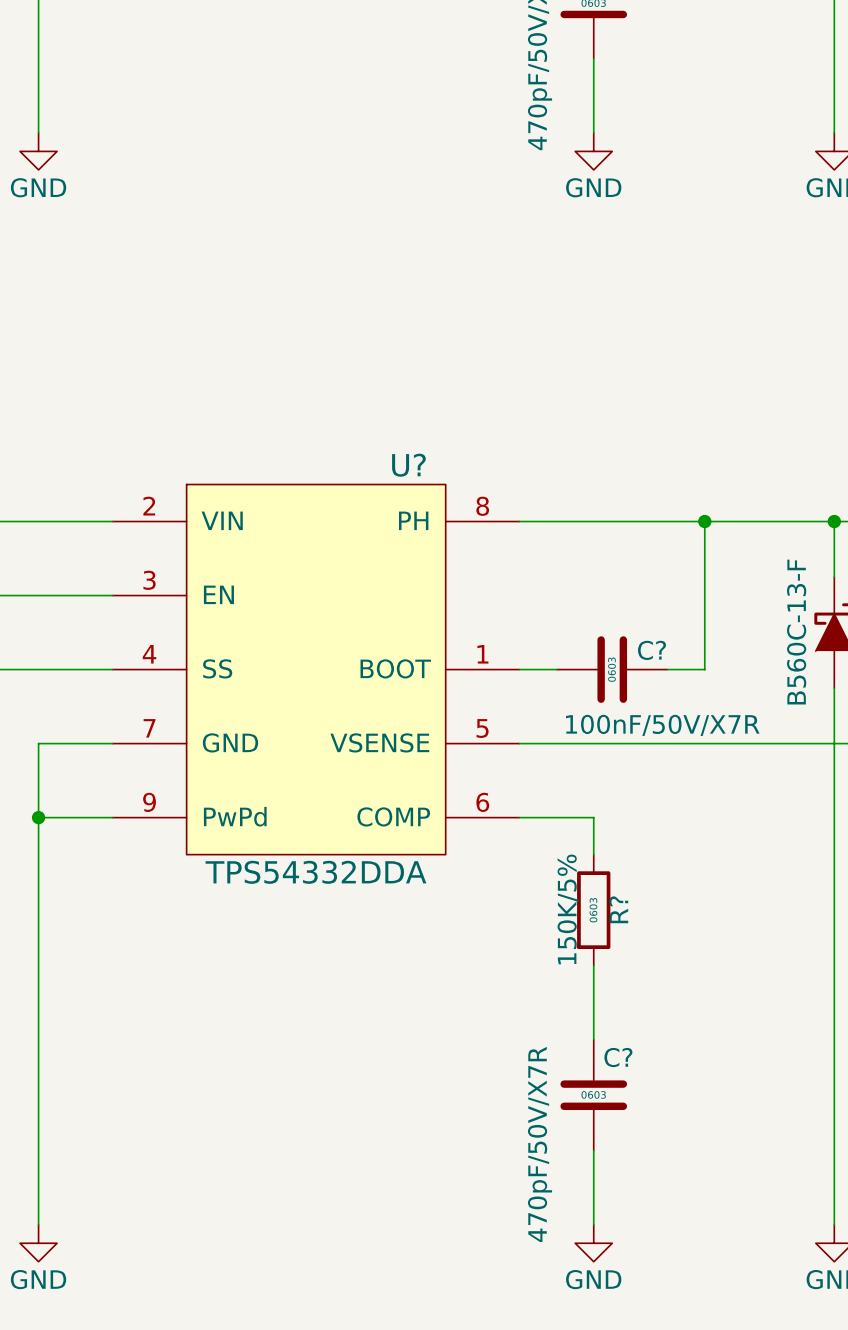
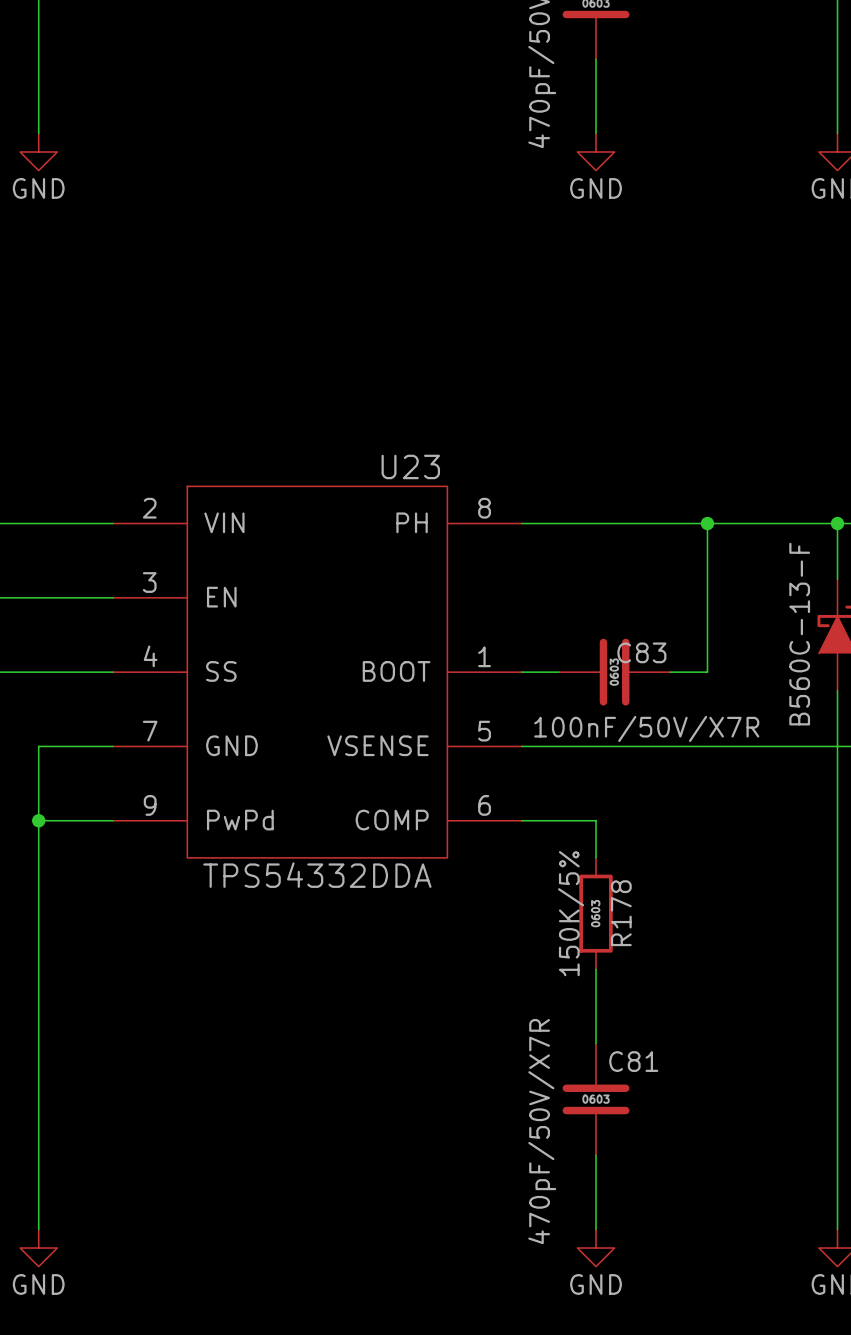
U? name: U? (408, 465) -> U23 (410, 466)
C? name: C? (651, 650) -> C83 (641, 652)
R? name: R? (618, 909) -> R178 (621, 913)
C? name: C? (618, 1057) -> C81 (633, 1061)

